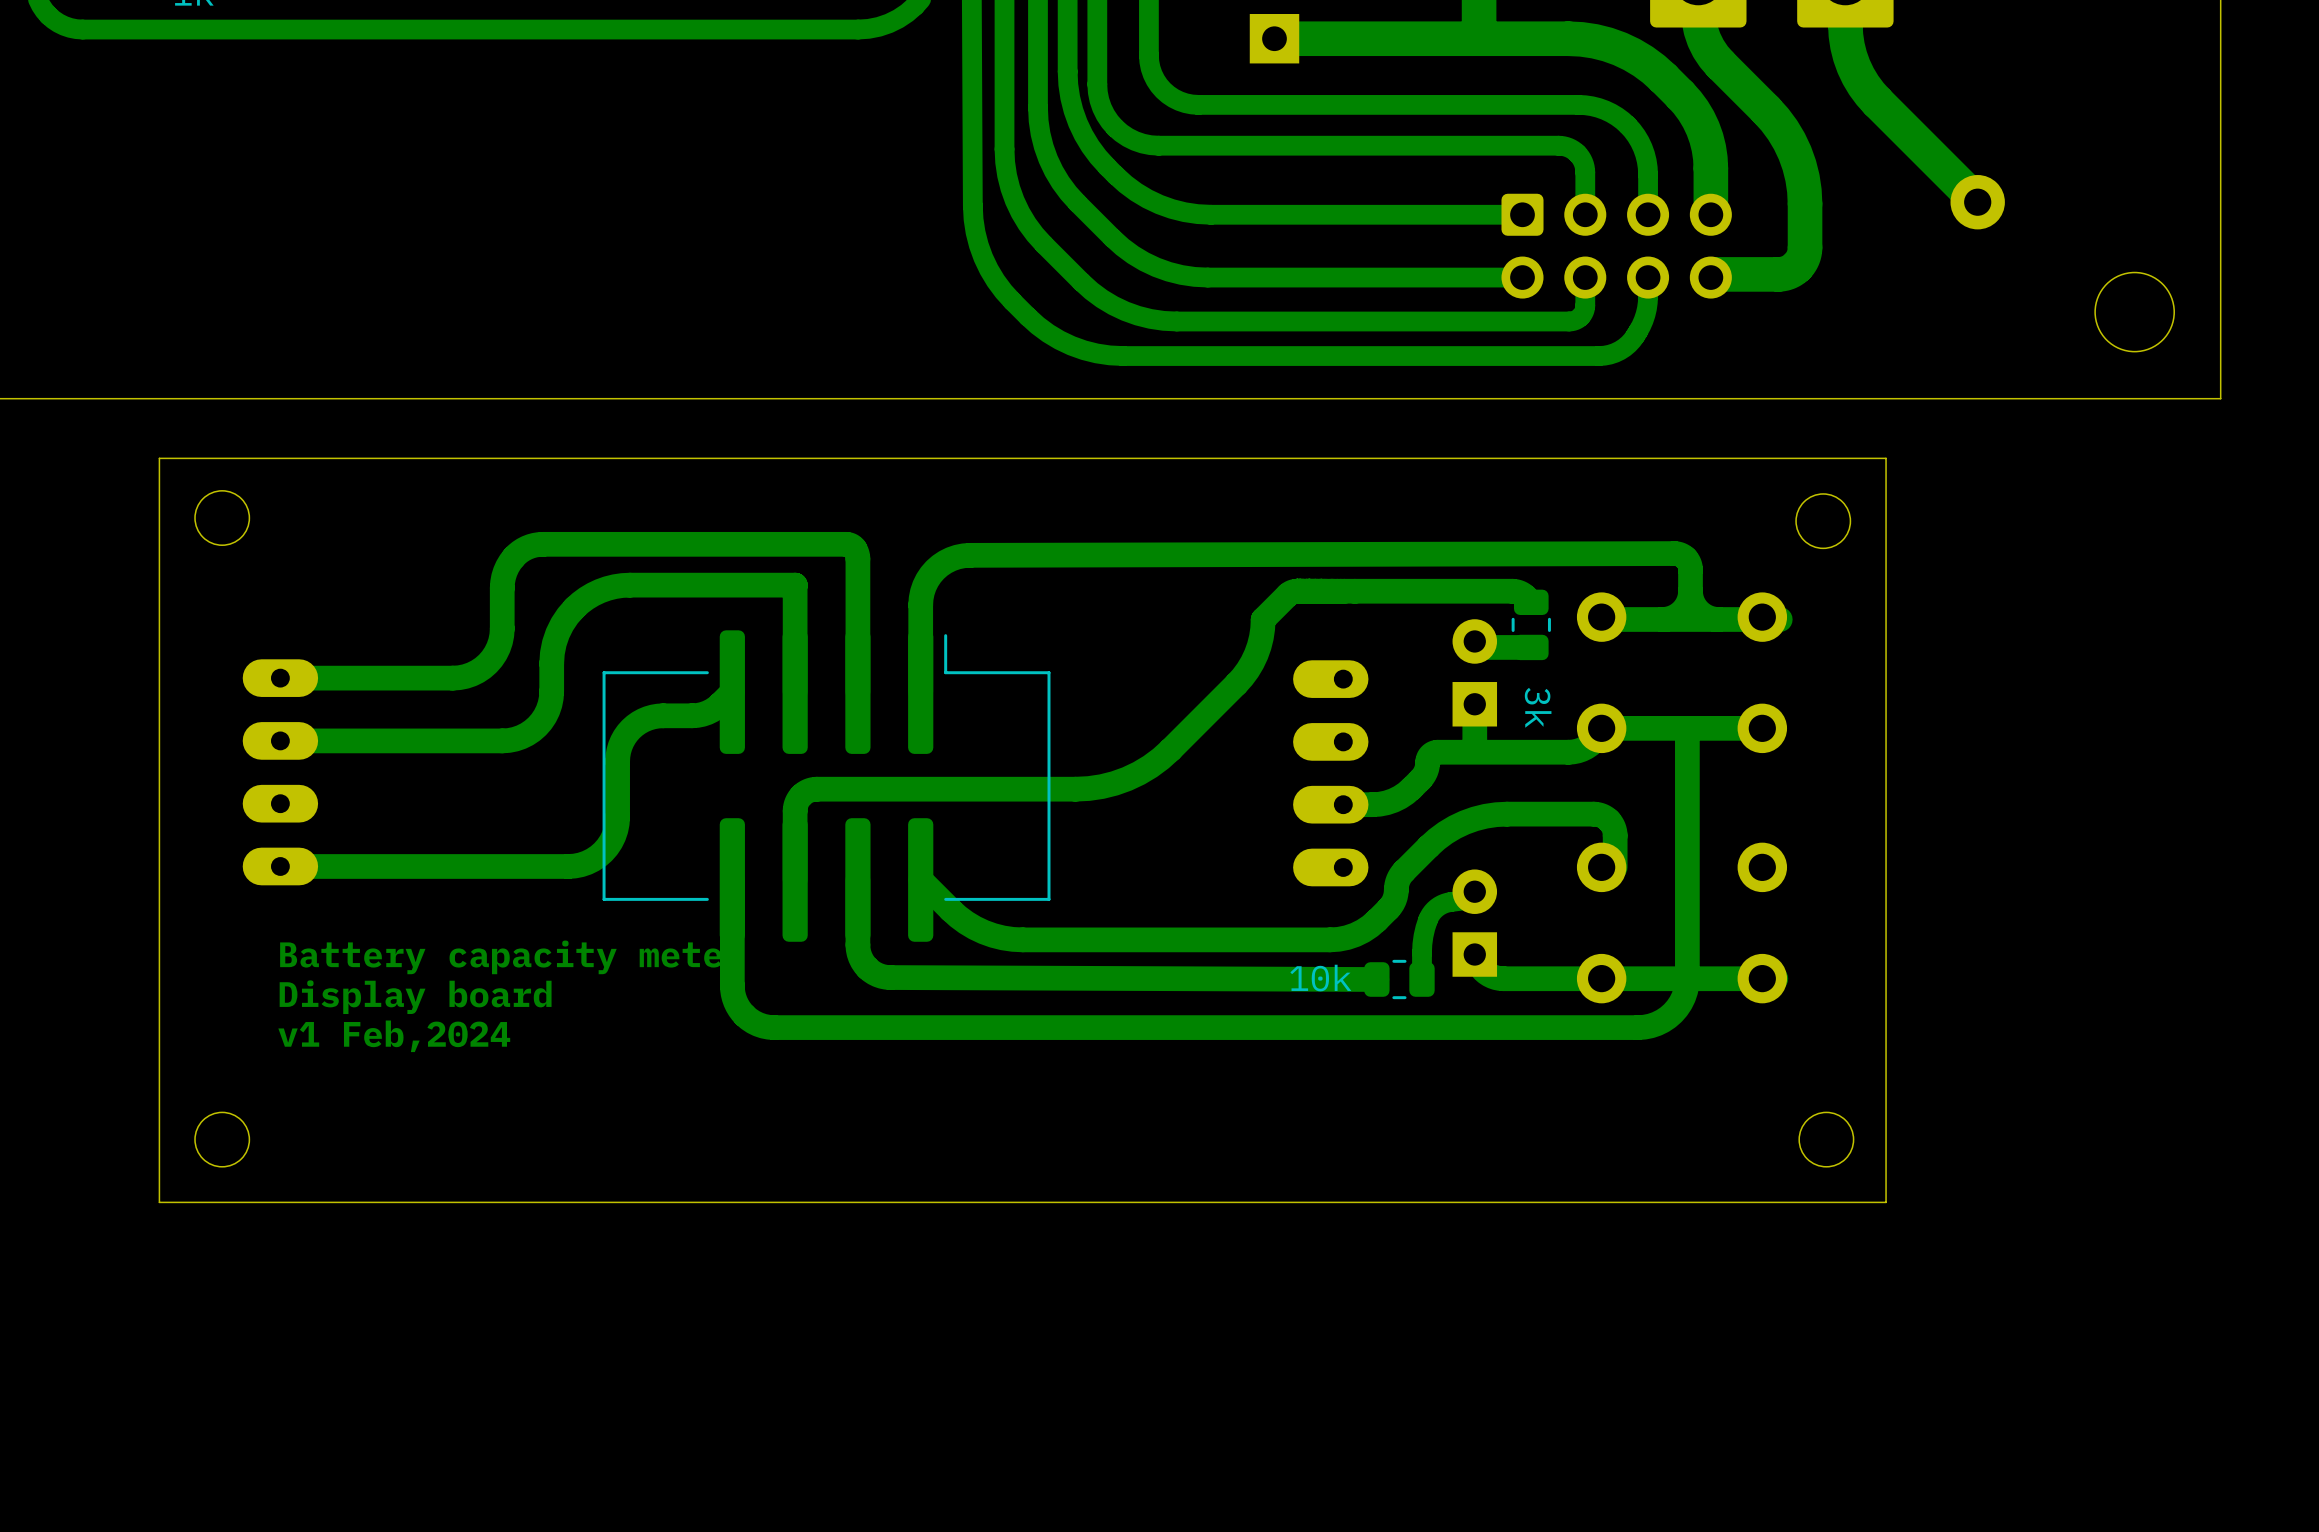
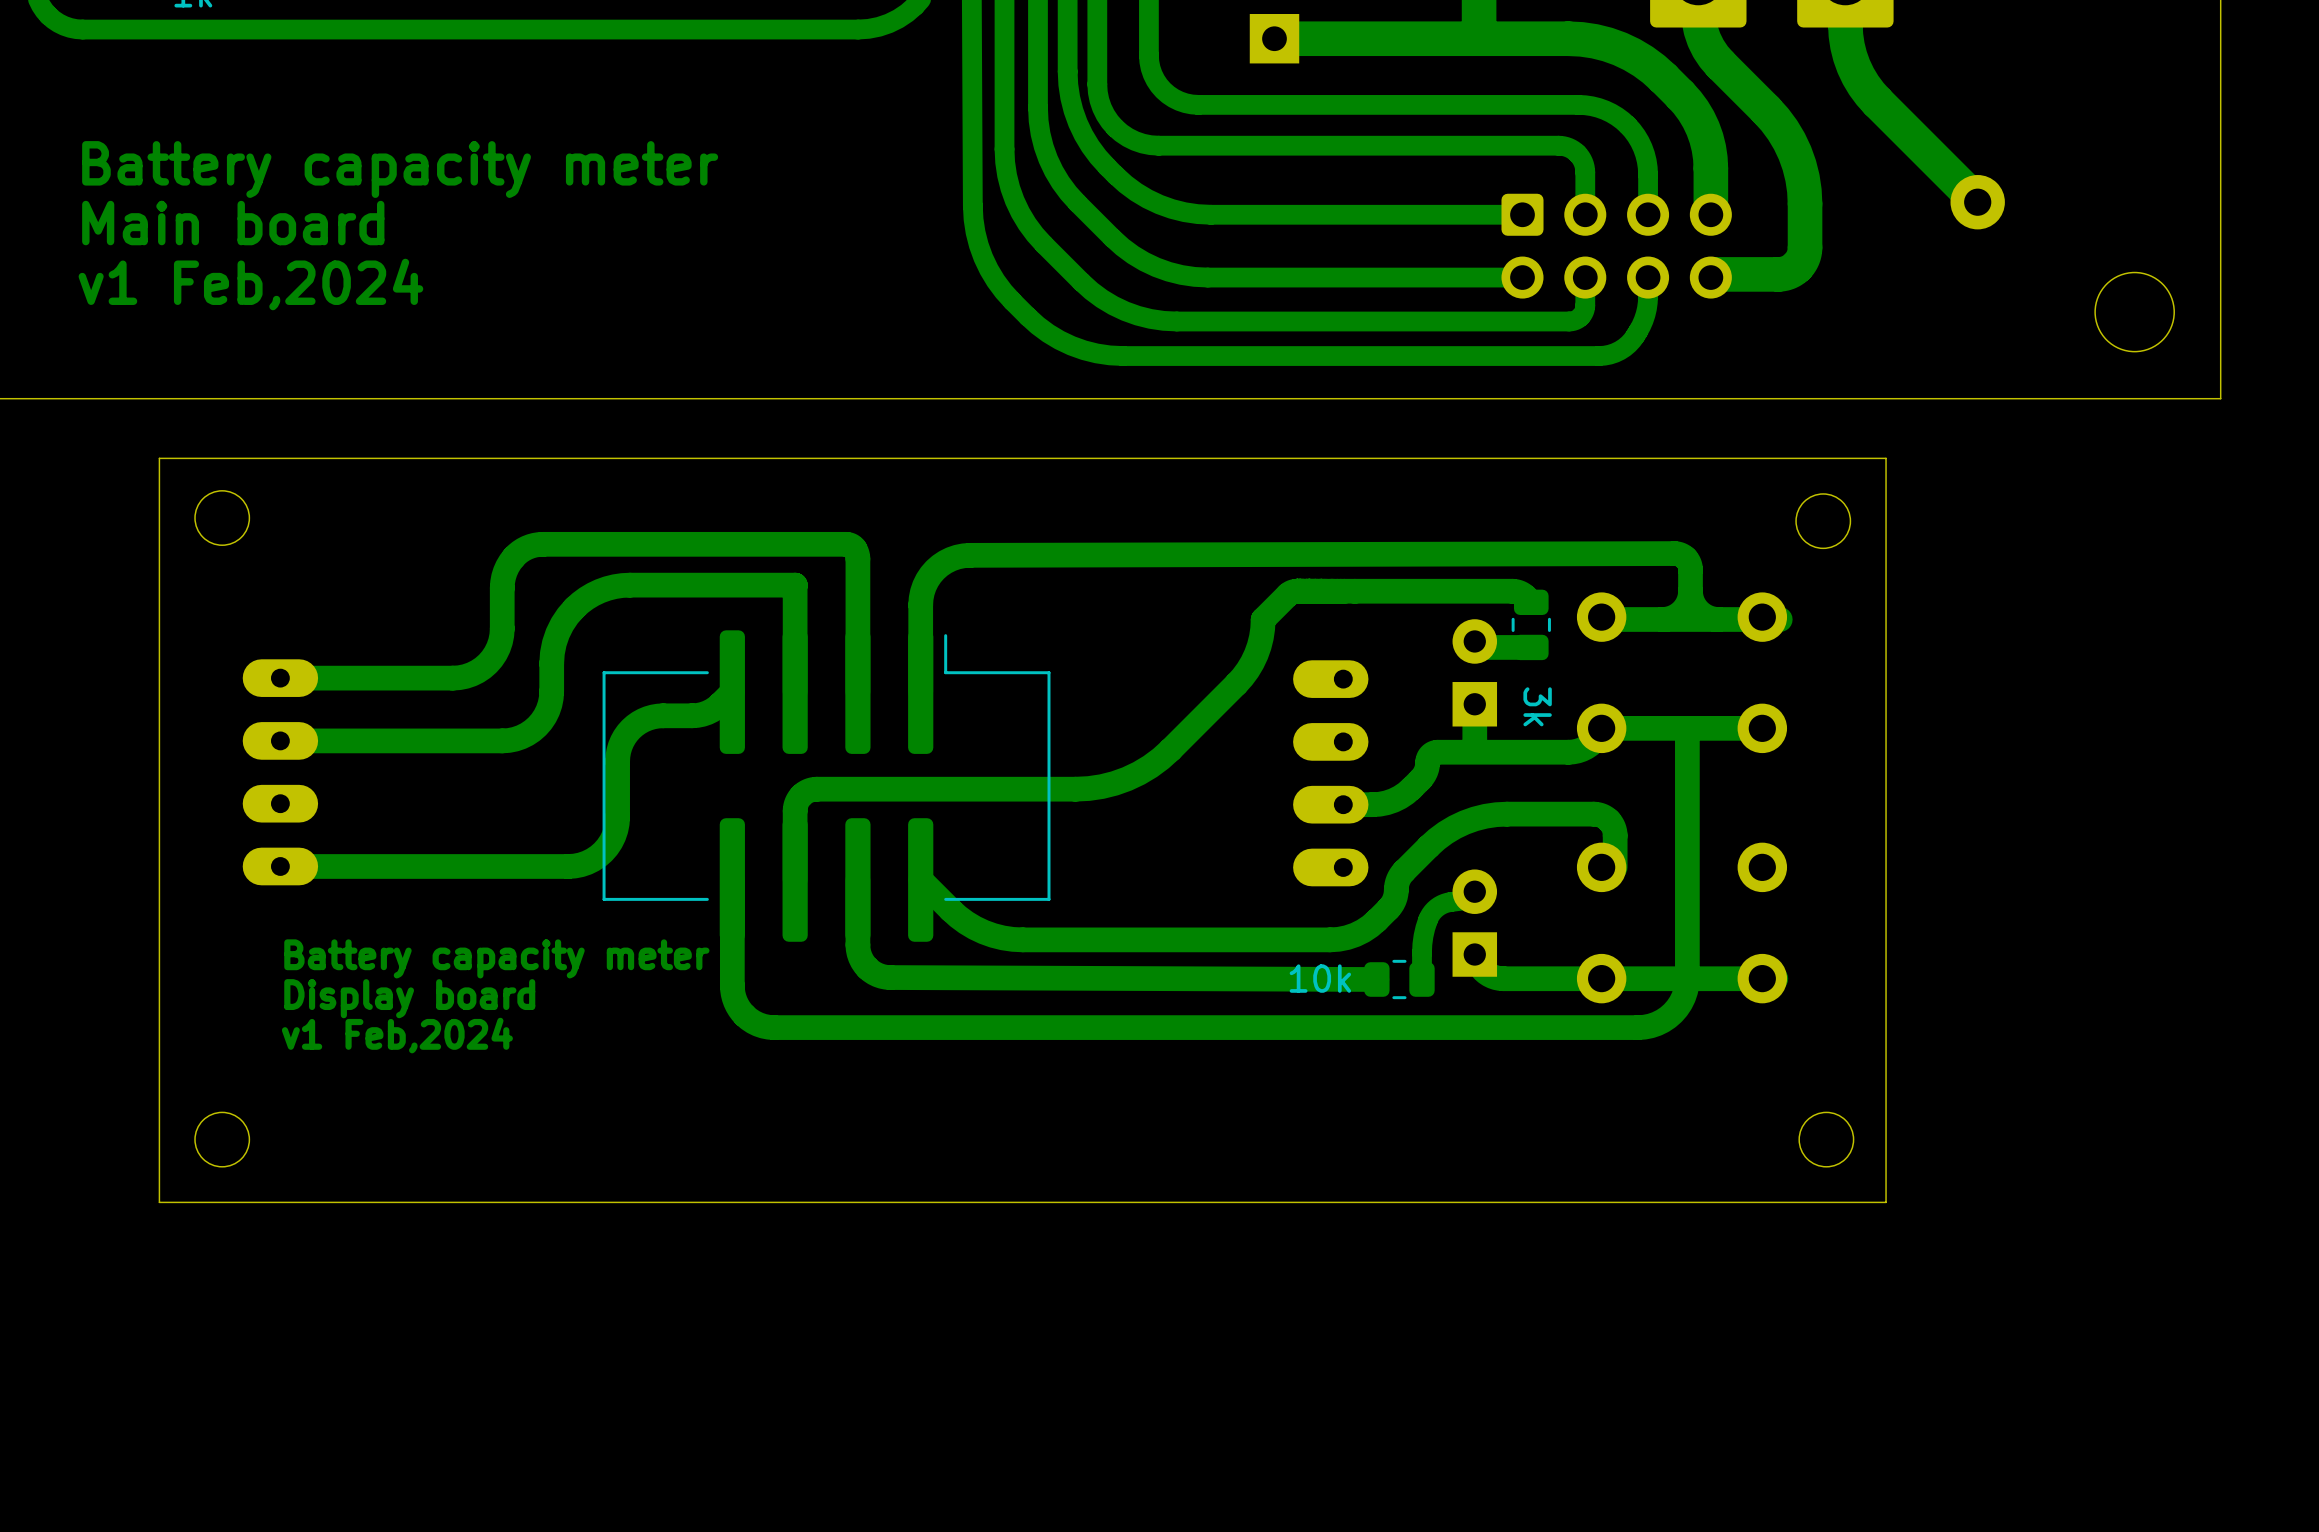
text: none -> Battery capacity meter (400, 169)
text: none -> Main board (233, 223)
text: none -> v1 Feb,2024 (250, 284)

